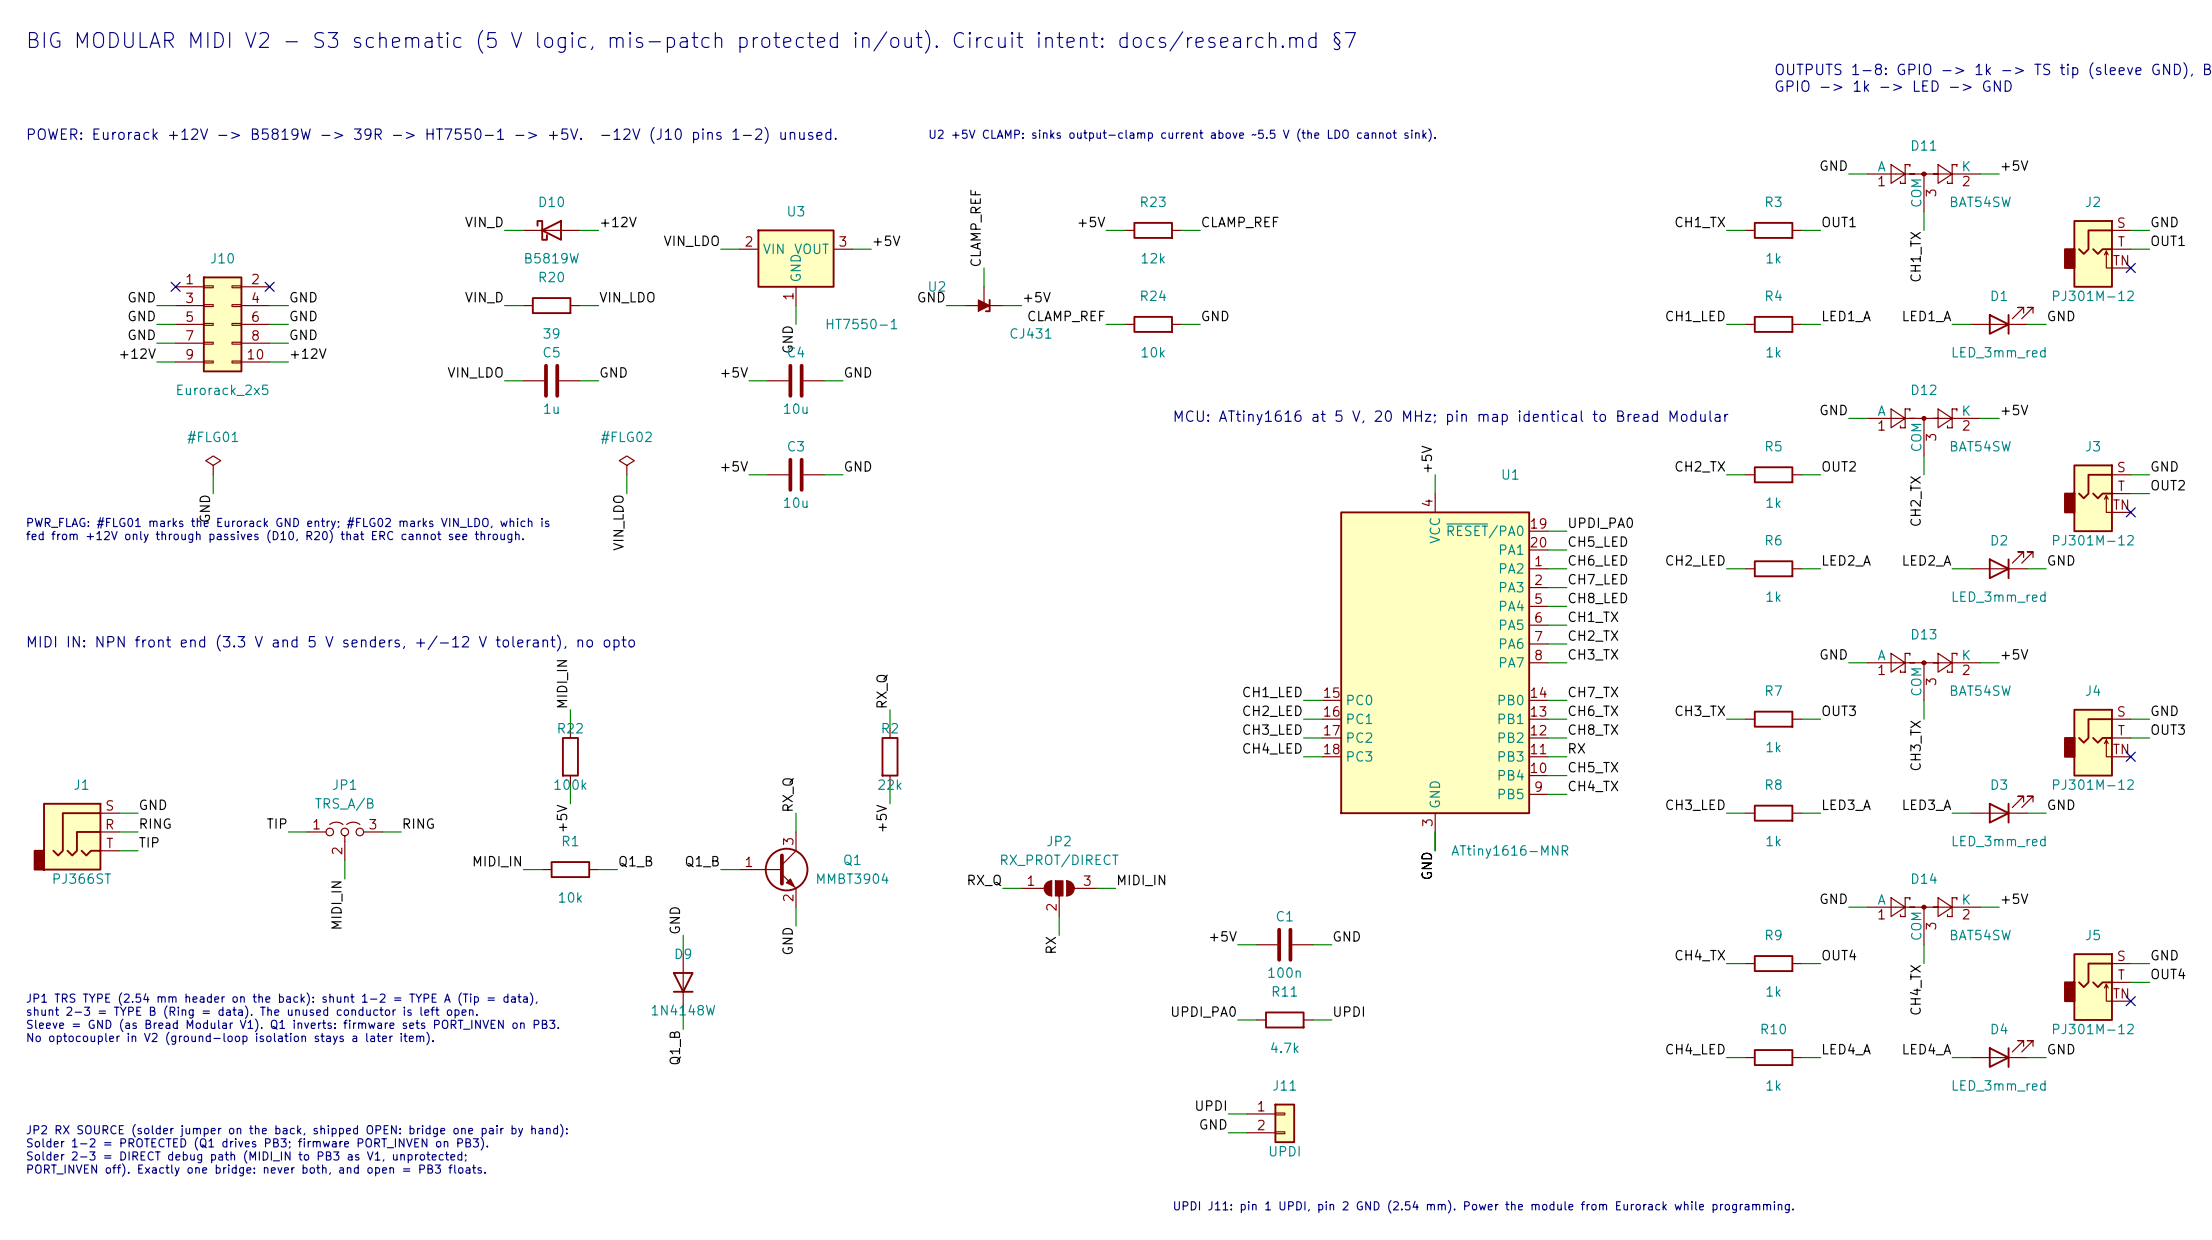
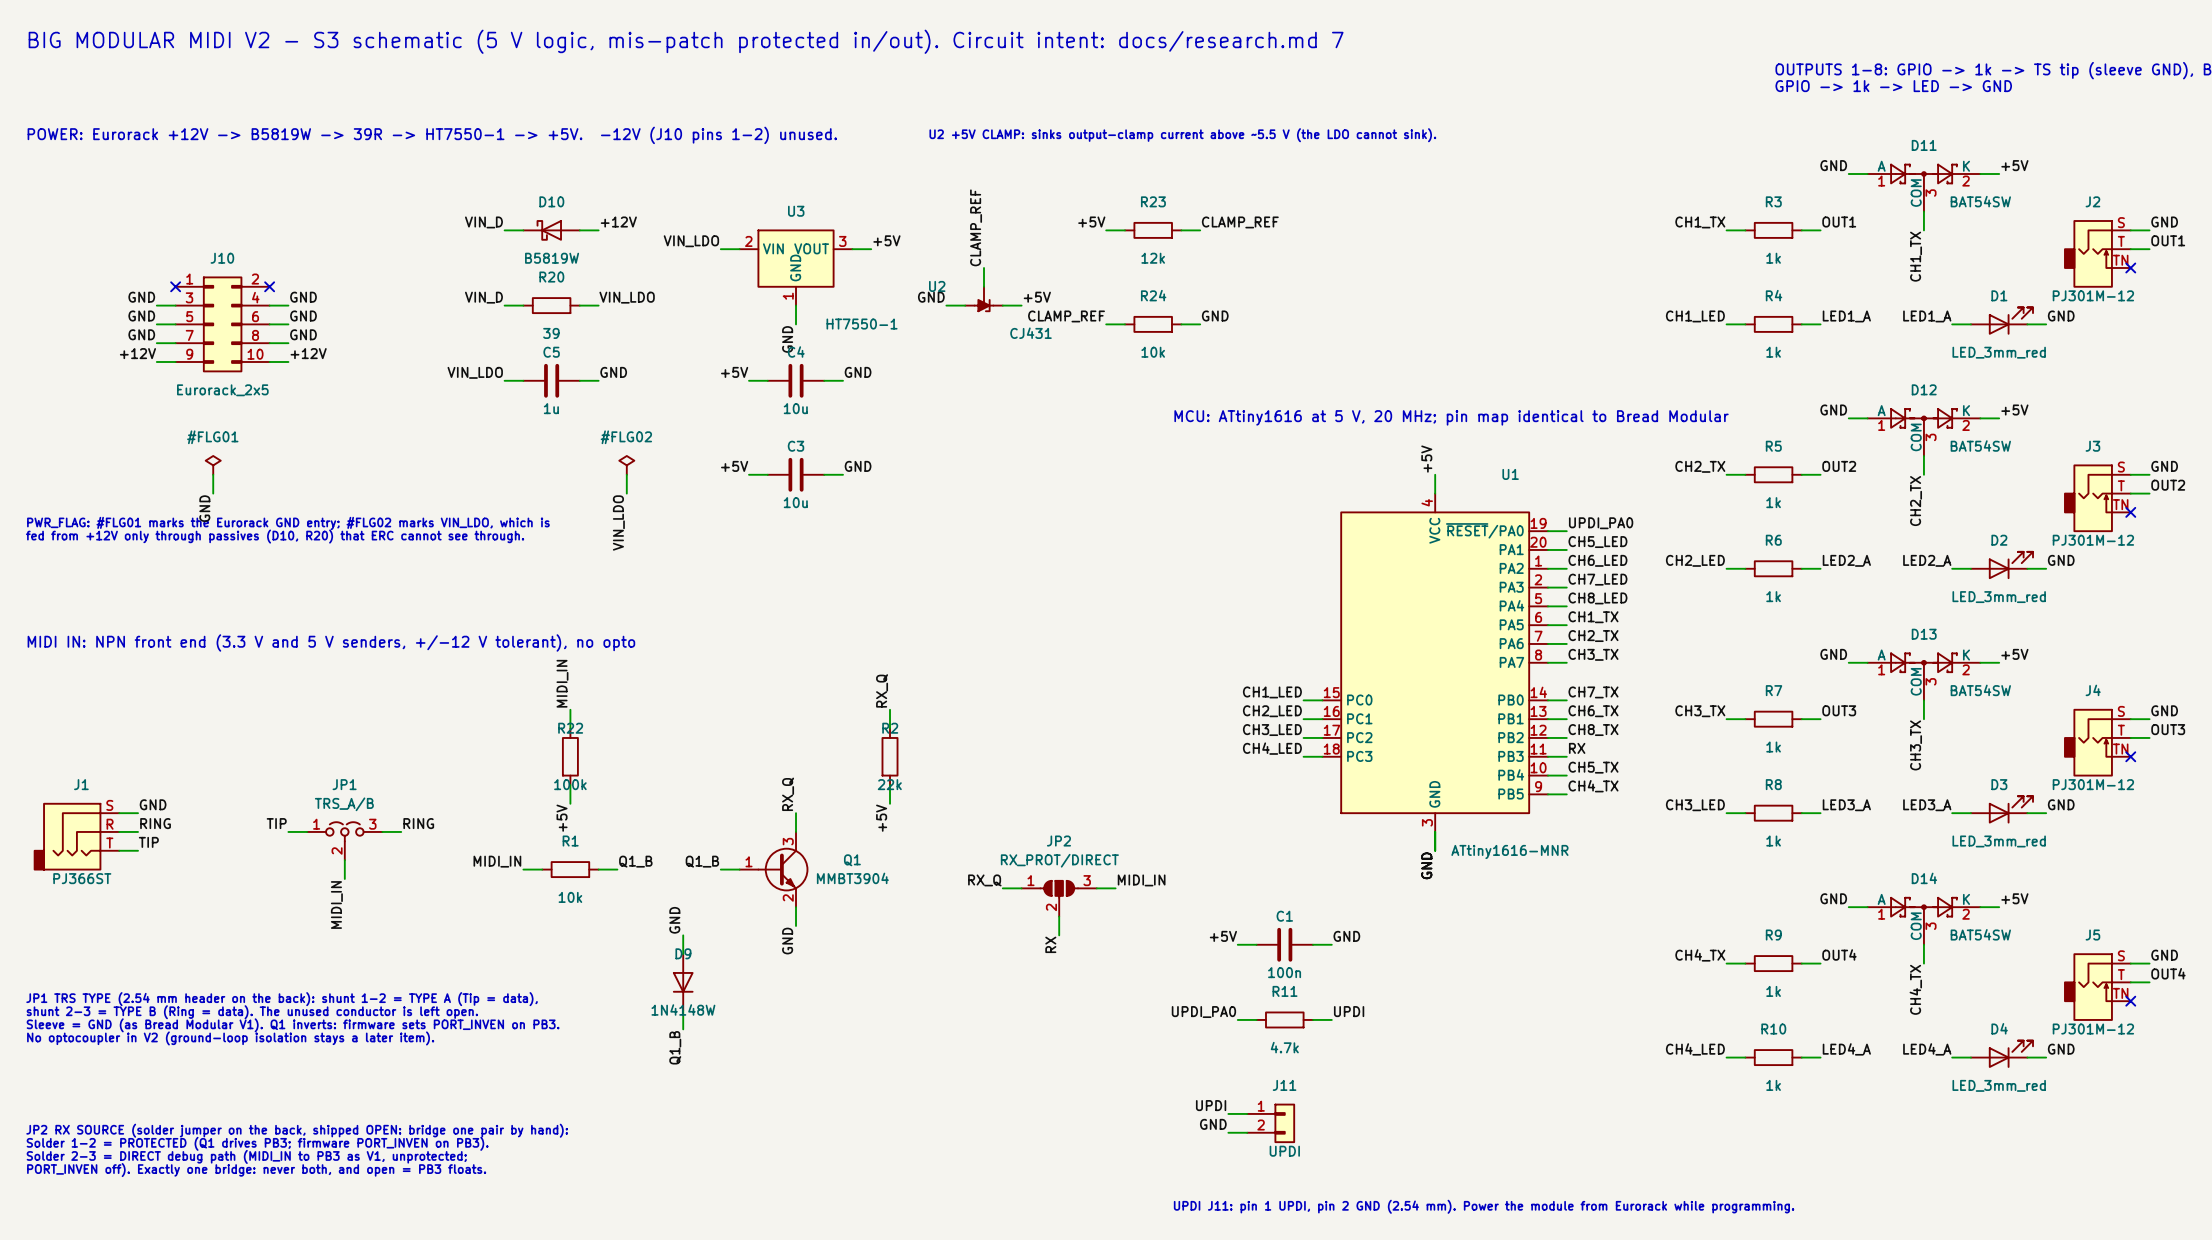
text: BIG MODULAR MIDI V2 - S3 schematic (5 V logic, mis-patch protected in/out). Circuit intent: docs/research.md §7 (692, 41) -> BIG MODULAR MIDI V2 - S3 schematic (5 V logic, mis-patch protected in/out). Circuit intent: docs/research.md 7 (686, 41)

